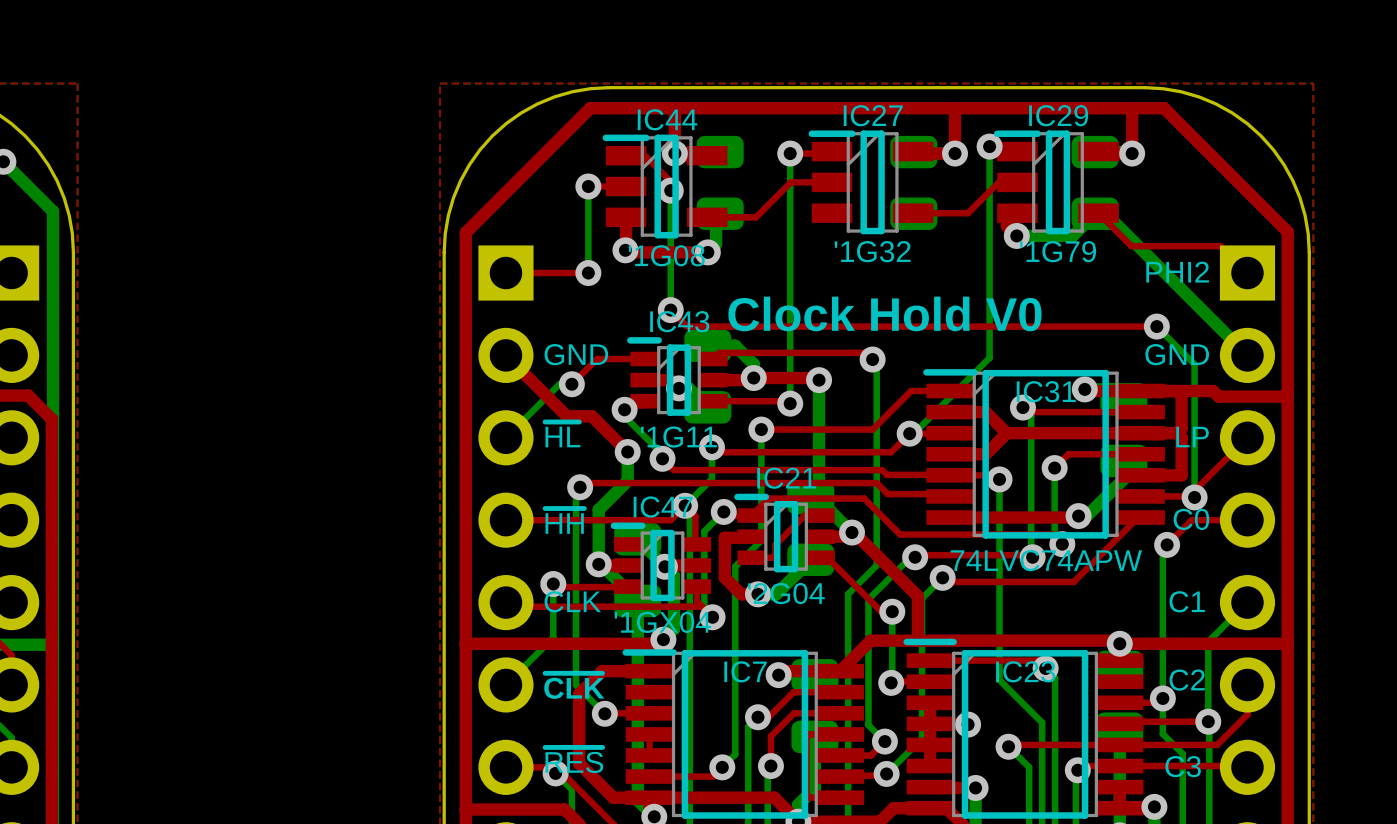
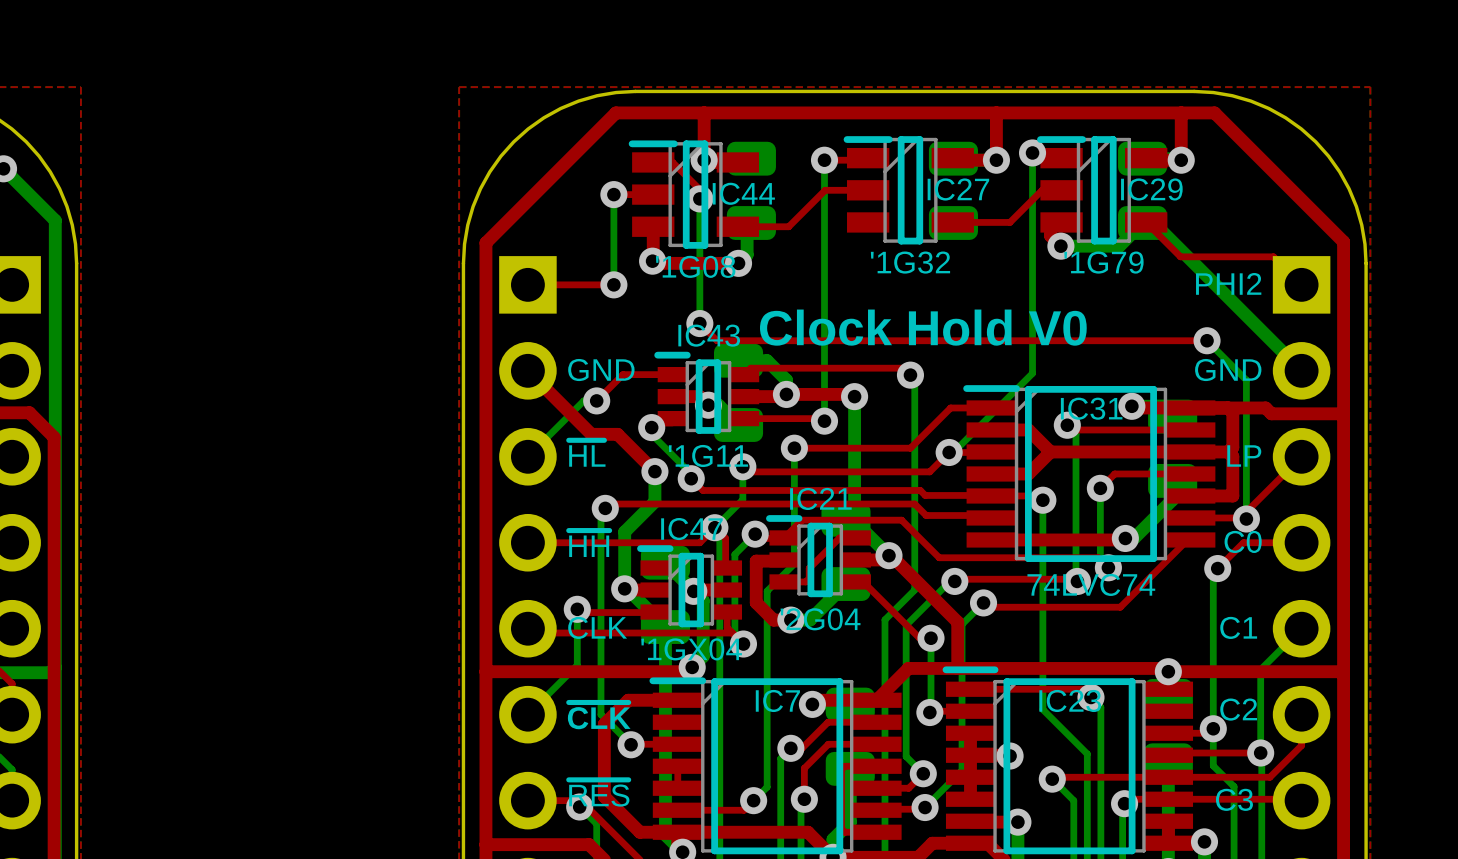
IC27 name position: IC27 (873, 115) -> IC27 (958, 189)
IC29 name position: IC29 (1058, 115) -> IC29 (1151, 189)
IC44 name position: IC44 (667, 119) -> IC44 (743, 193)
IC31 text: 74LVC74APW (1046, 560) -> 74LVC74 (1091, 584)

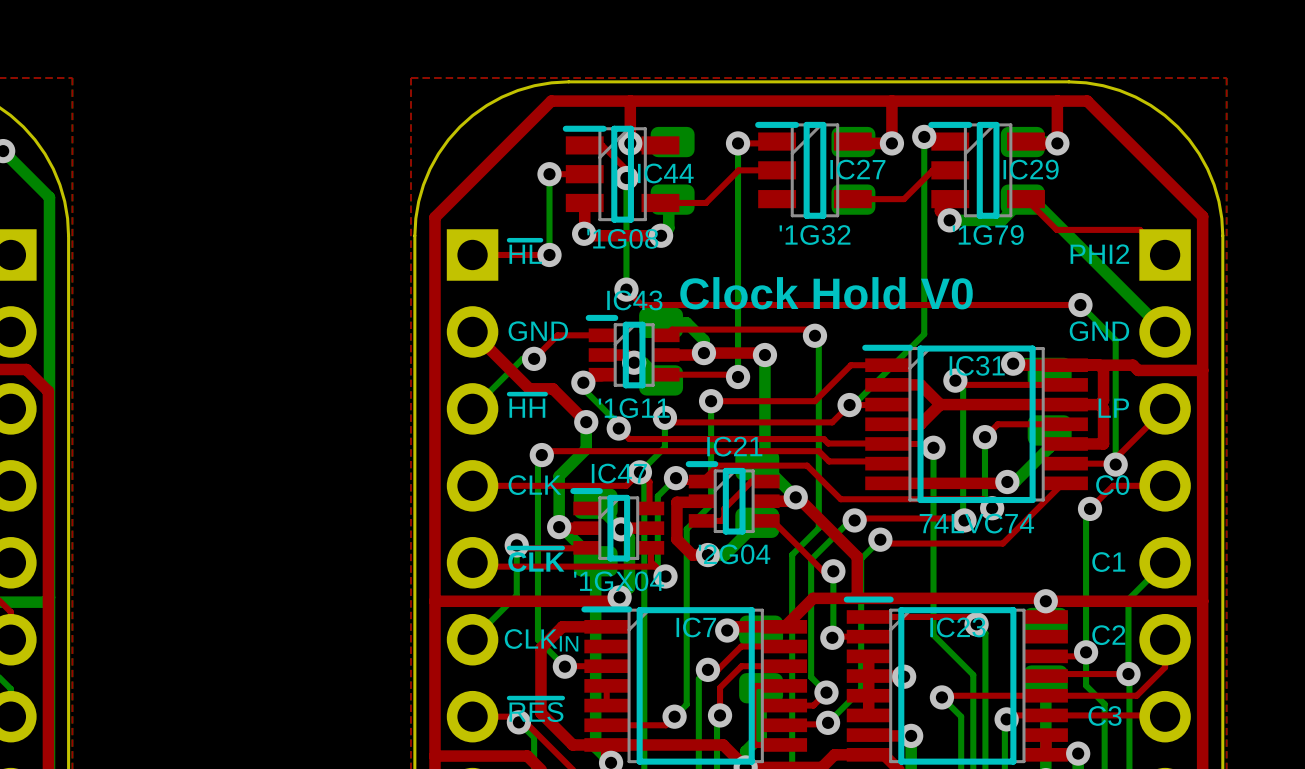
text: none -> ~{HL} (525, 252)
text: ~{HL} (587, 453) -> ~{HH} (527, 405)
text: ~{HH} (589, 543) -> CLK (534, 485)
text: CLK (597, 627) -> ~{CLK} (536, 559)
text: ~{CLK} (599, 715) -> CLKIN (541, 640)

